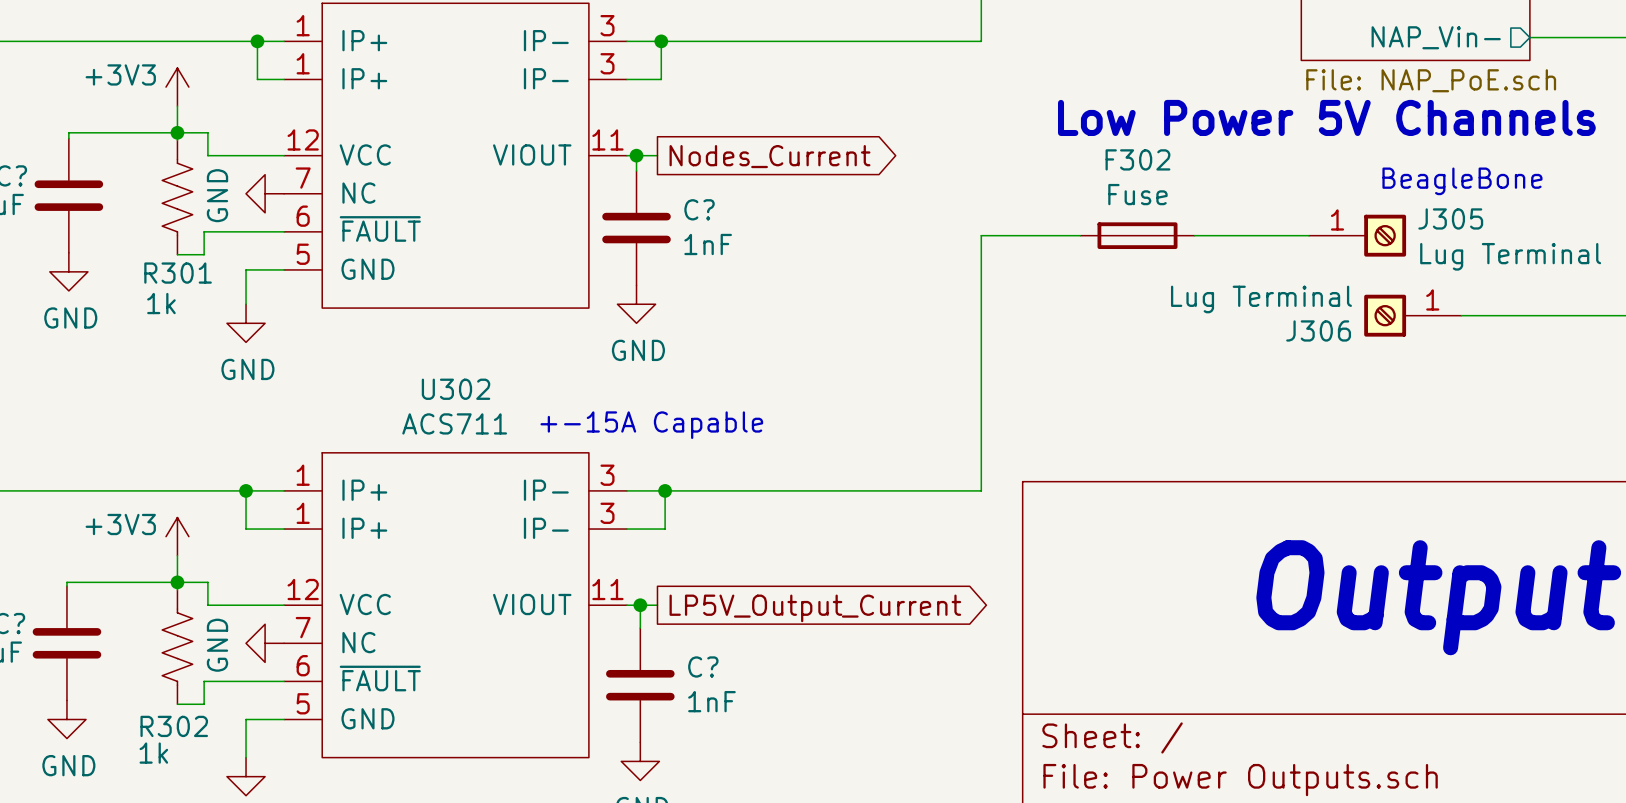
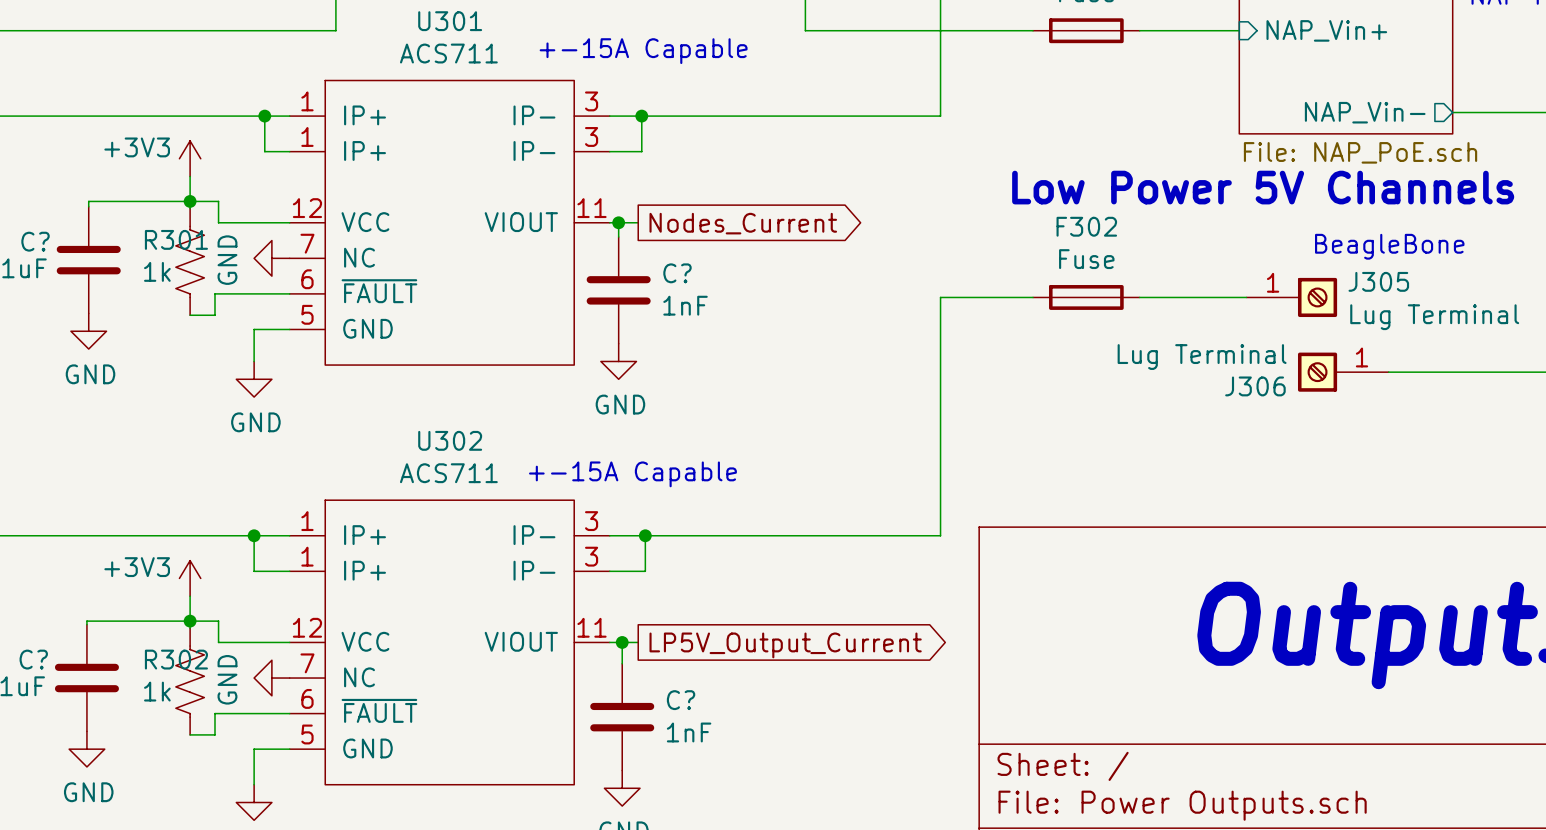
R301 name position: R301 (178, 273) -> R301 (176, 239)
R301 value position: 1k (161, 303) -> 1k (157, 271)
R302 name position: R302 (174, 726) -> R302 (176, 659)
R302 value position: 1k (153, 753) -> 1k (157, 691)

